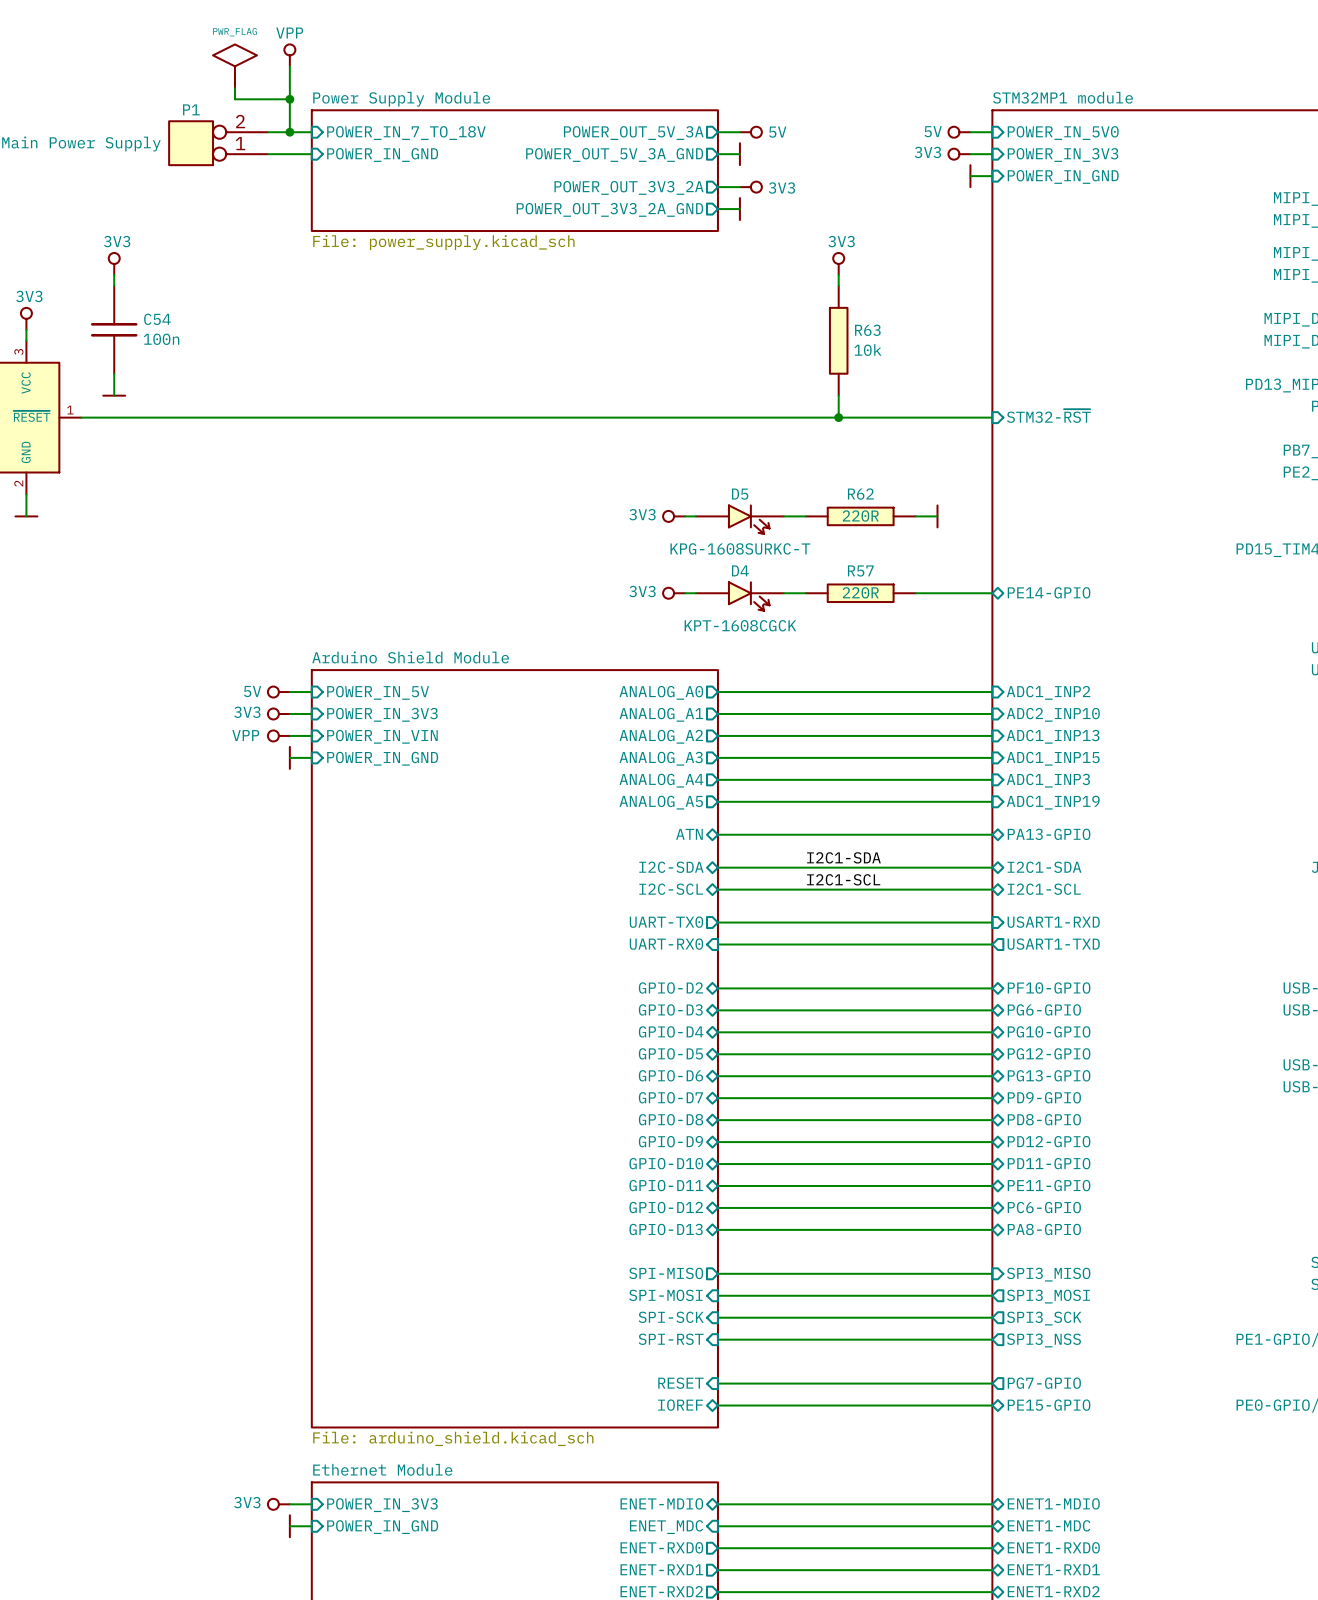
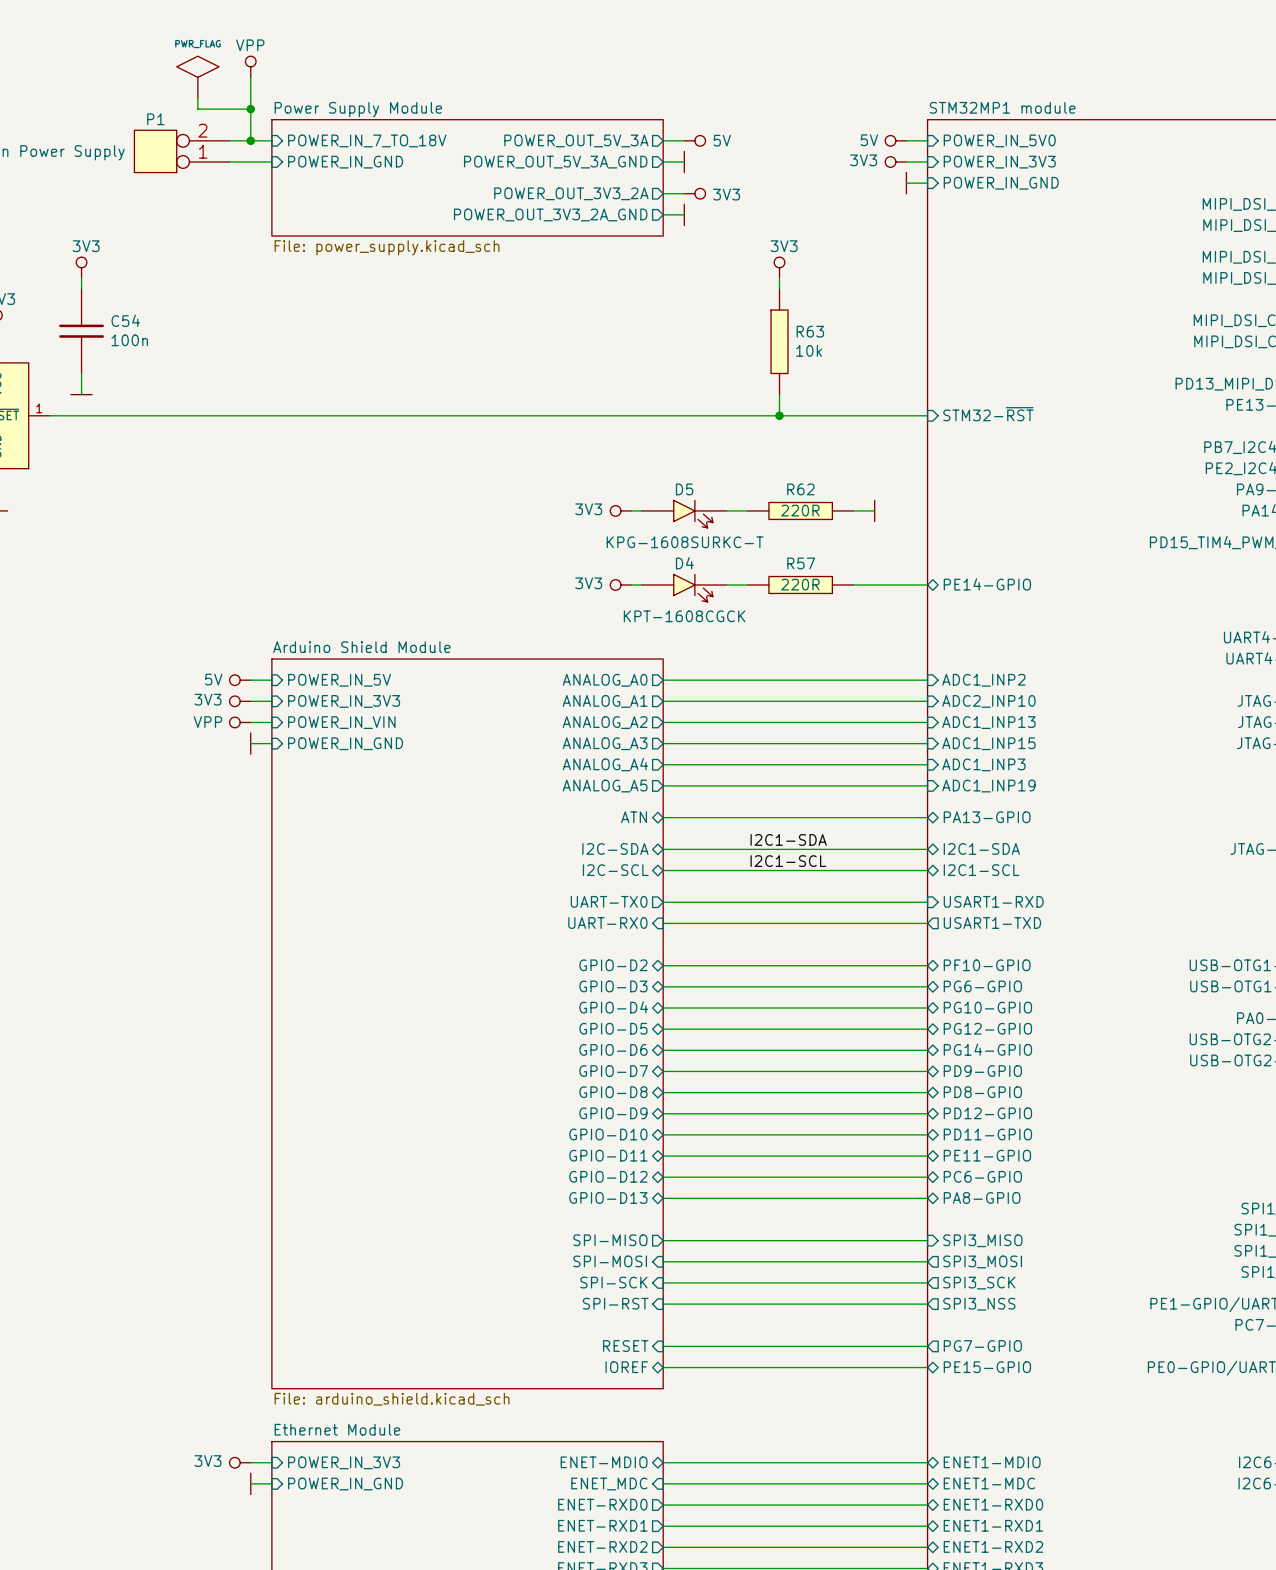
sheet pin: PG13-GPIO (1049, 1075) -> PG14-GPIO (987, 1049)

